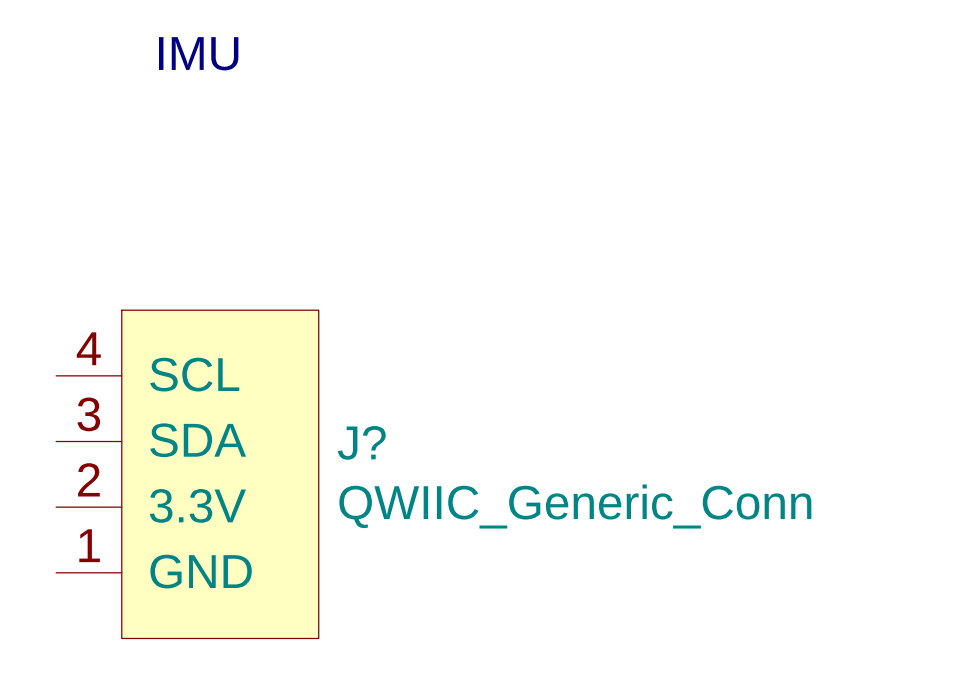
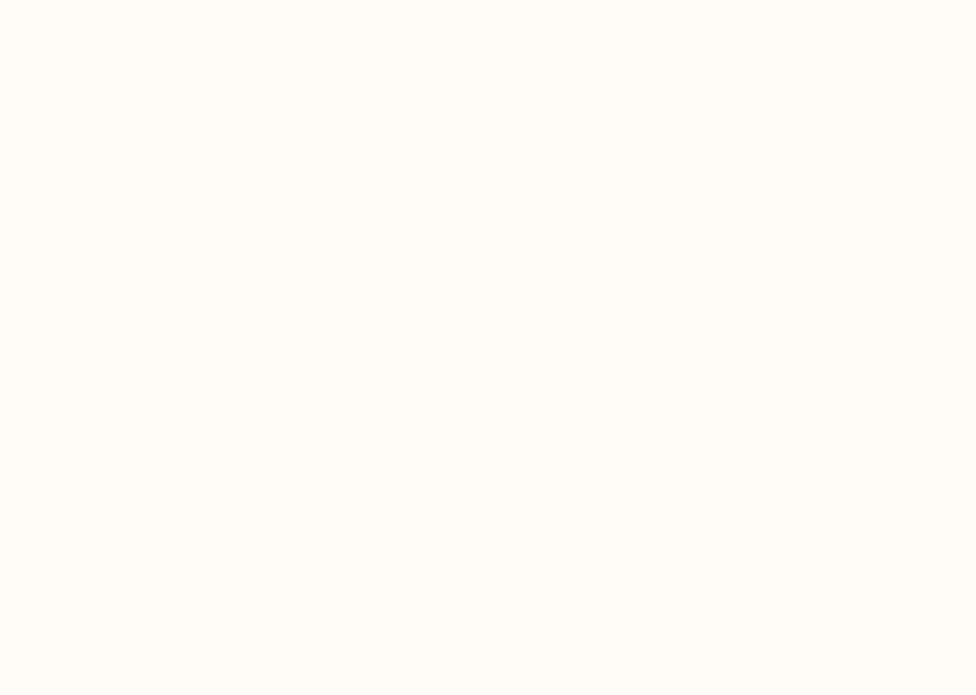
text: IMU (198, 53) -> none
J?: QWIIC_Generic_Conn (187, 474) -> none

